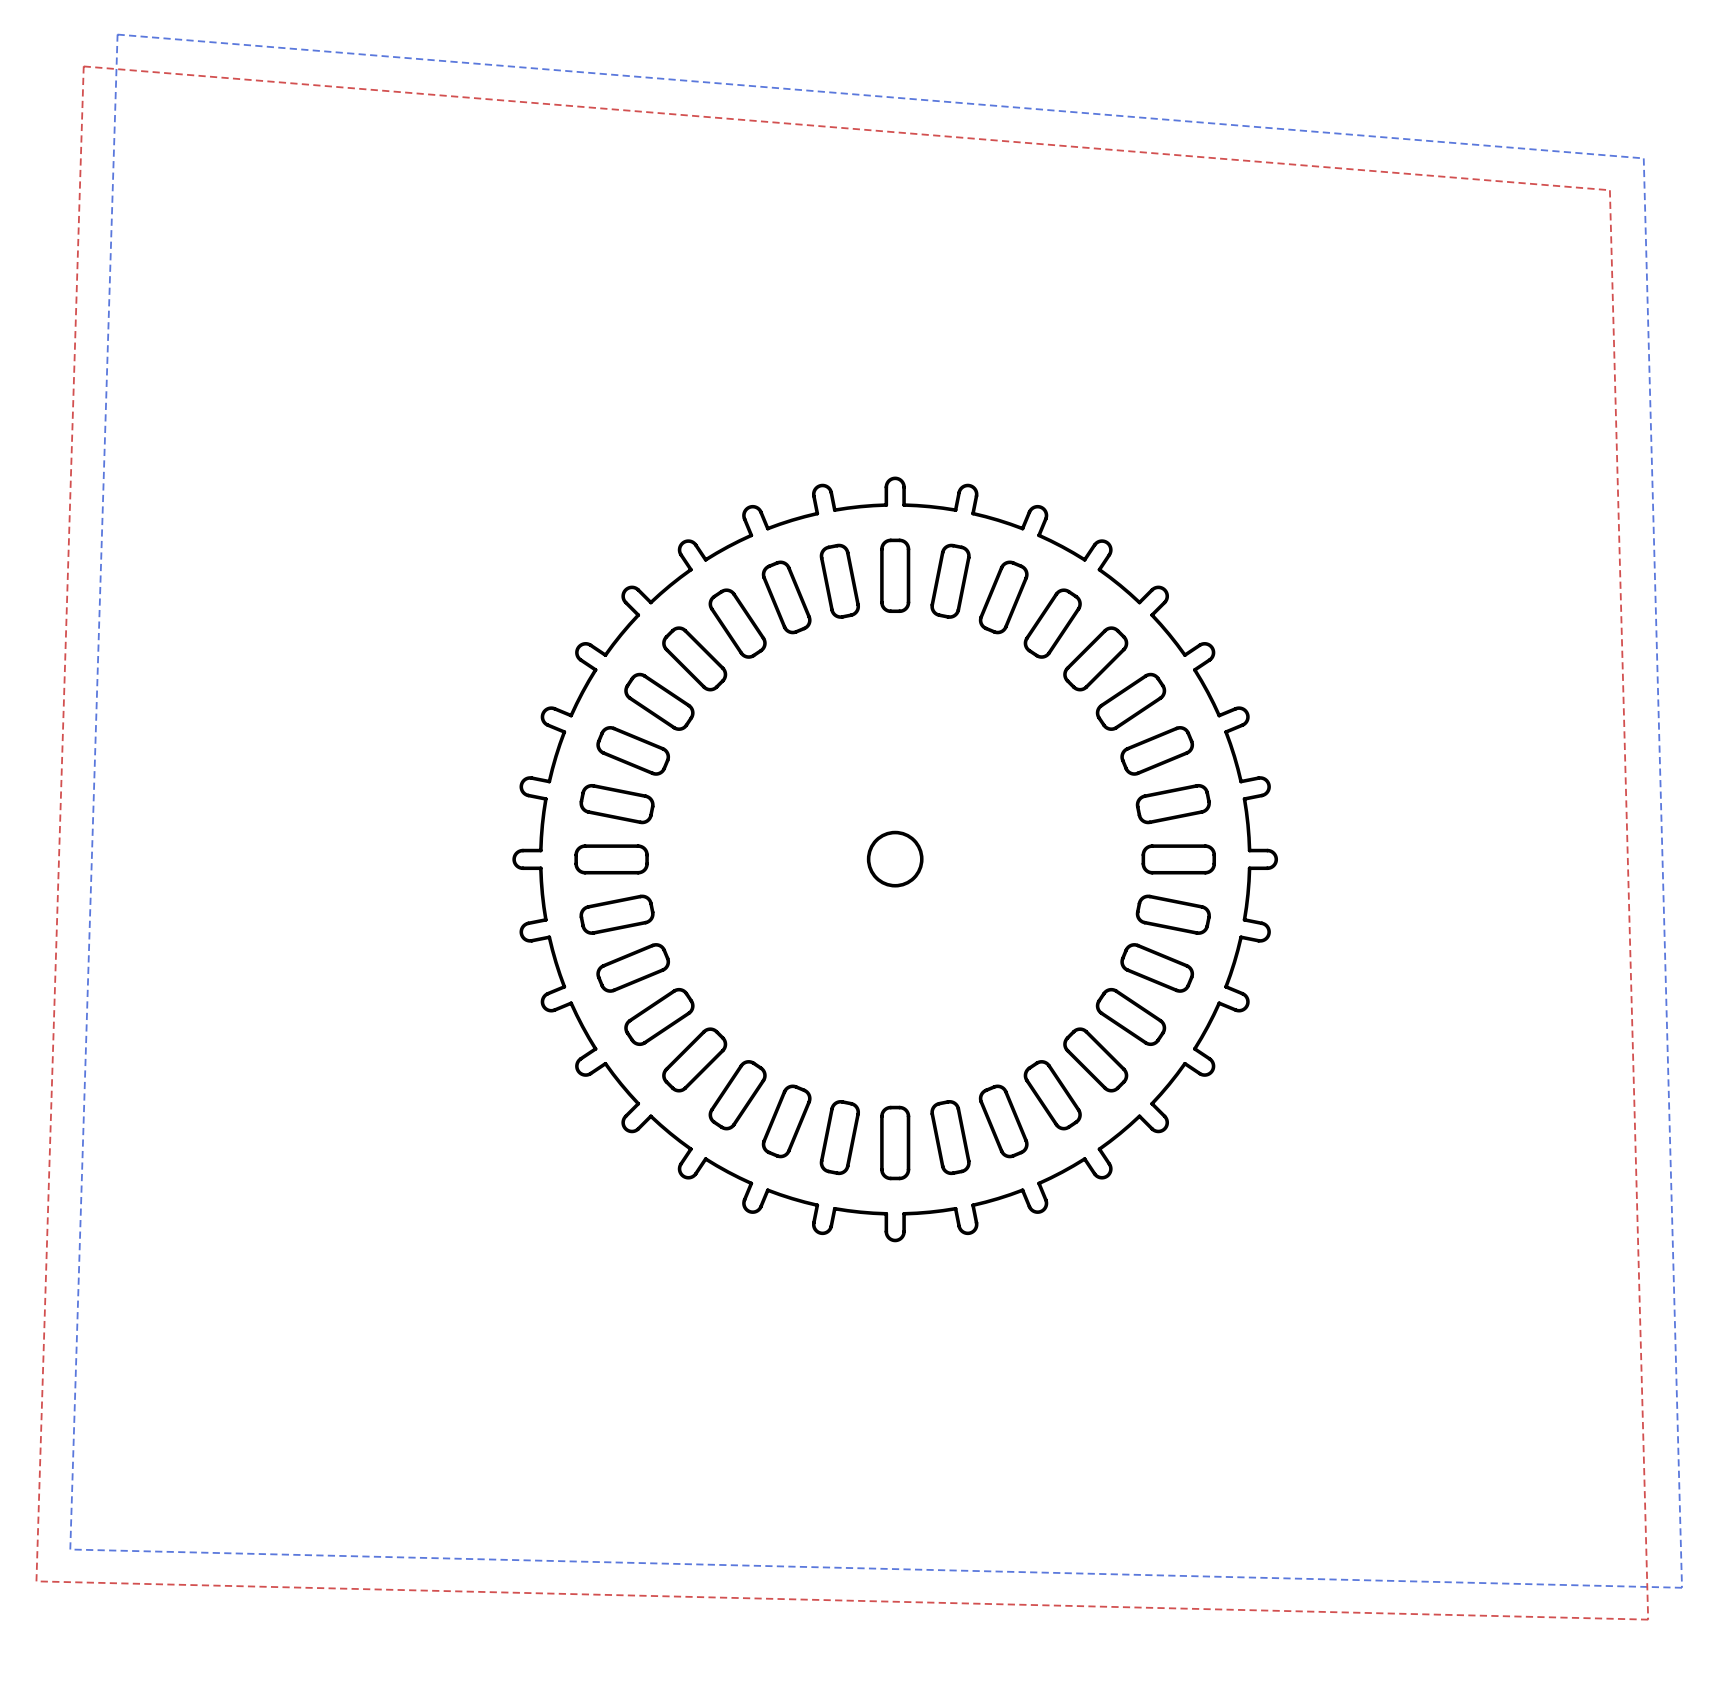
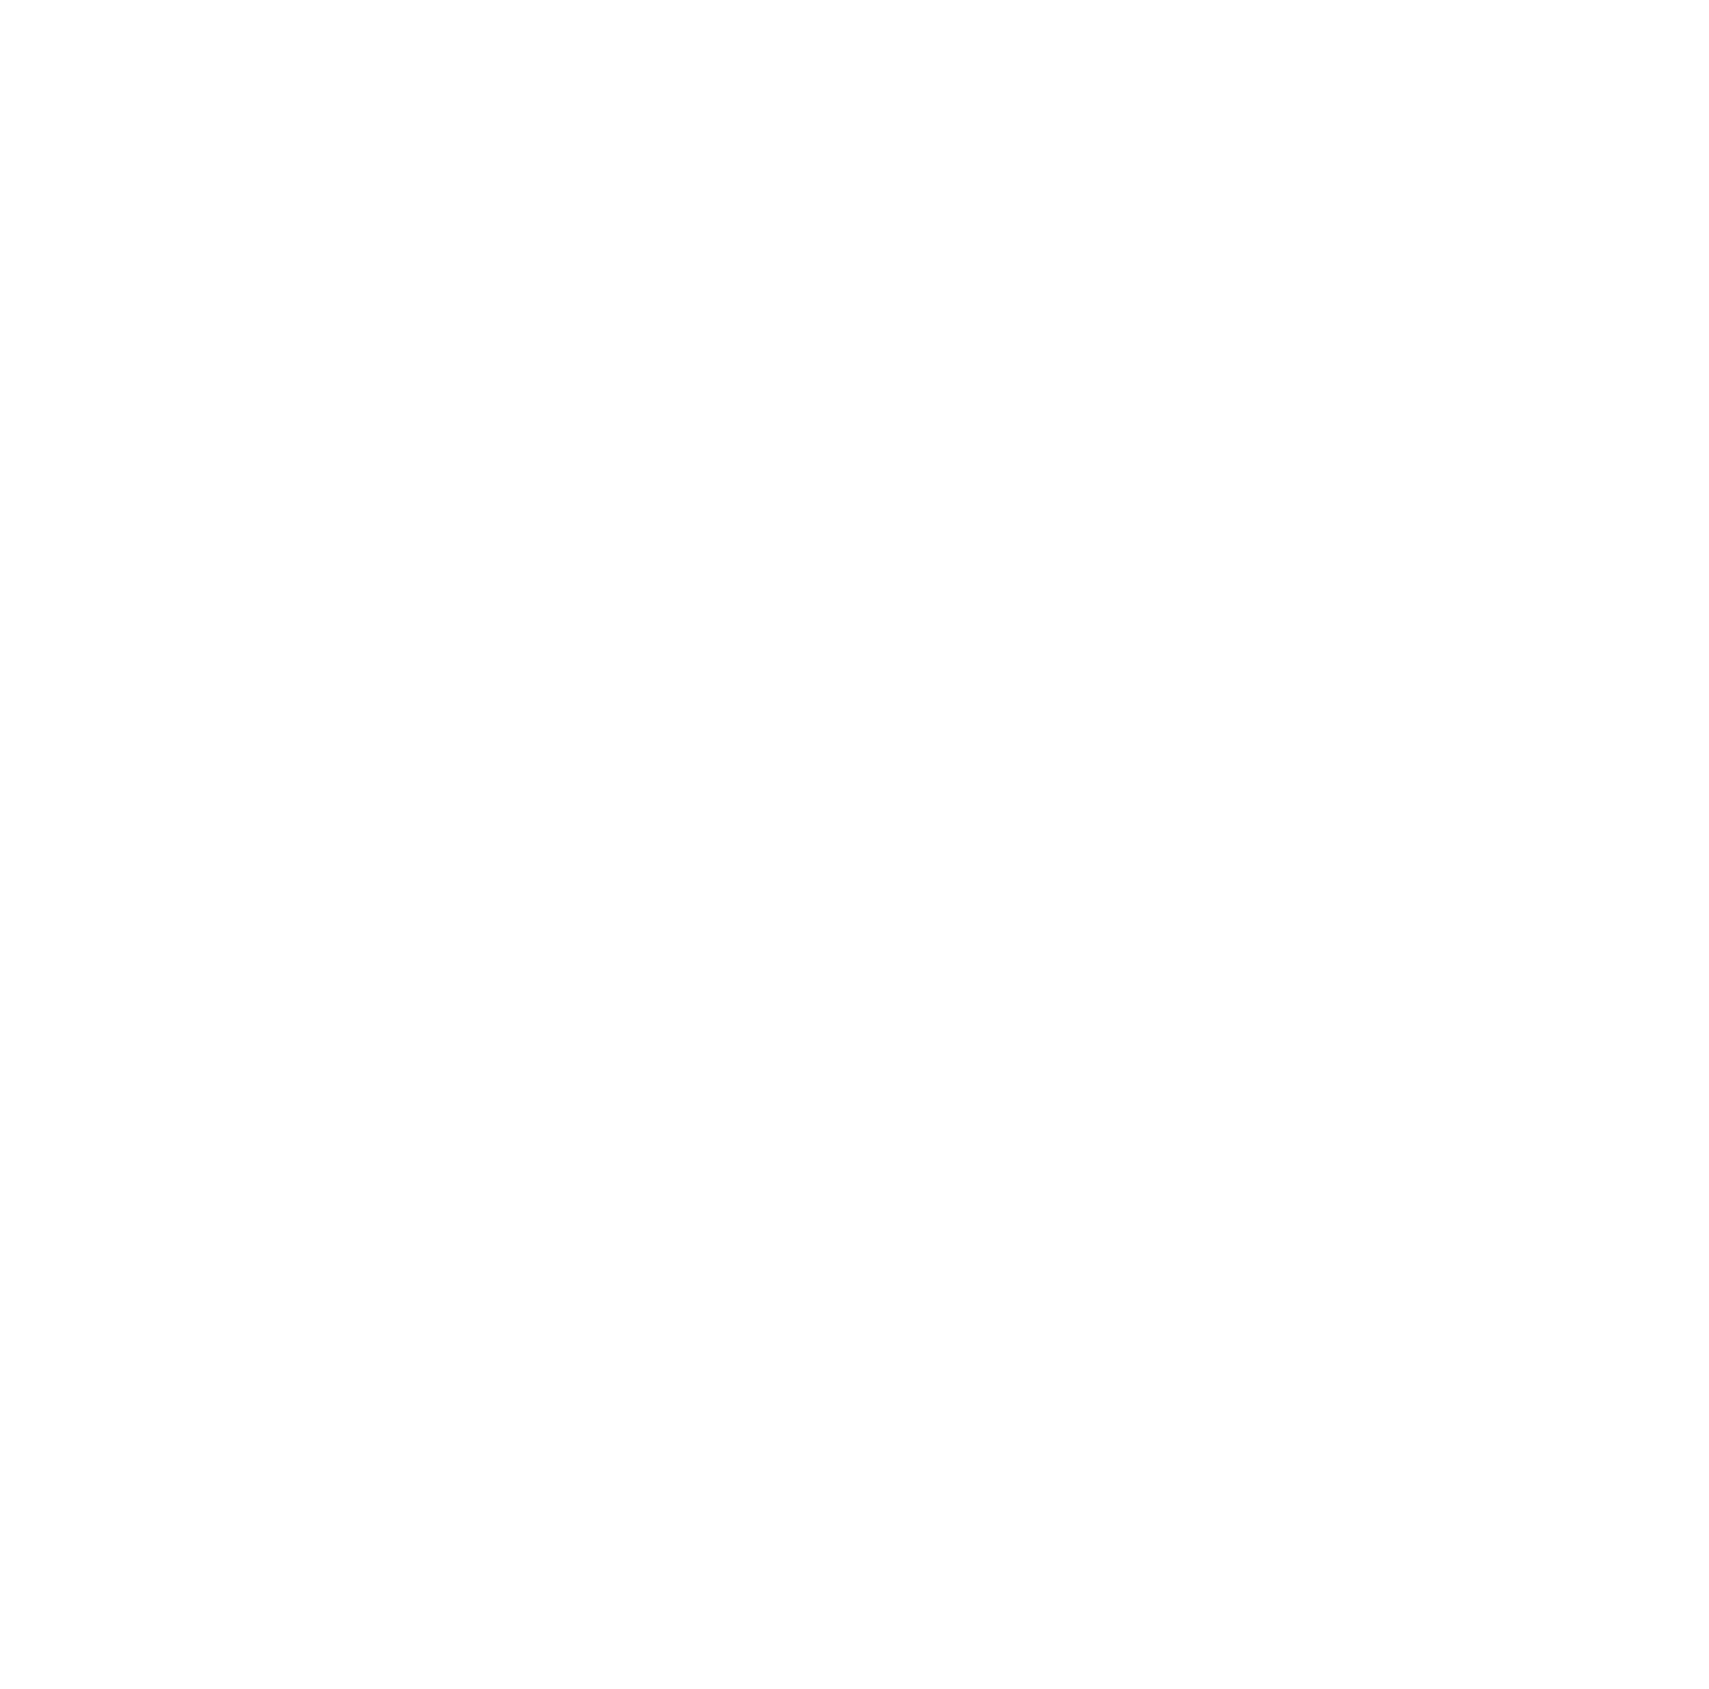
bottom zone outline: (117, 34) (70, 1549) (1682, 1587) (1643, 158) (117, 34) -> none
top zone outline: (83, 66) (36, 1581) (1648, 1619) (1609, 190) (83, 66) -> none
board edge: (886, 487) (886, 505) (834, 510) (829, 489) (825, 485) (819, 485) (813, 493) (817, 513) (767, 528) (759, 510) (755, 506) (749, 507) (745, 511) (743, 516) (751, 535) (705, 559) (694, 543) (688, 541) (683, 542) (680, 547) (680, 552) (690, 569) (650, 602) (636, 588) (630, 587) (625, 589) (623, 595) (624, 600) (638, 615) (605, 655) (588, 644) (582, 644) (578, 647) (576, 653) (579, 658) (595, 669) (571, 715) (552, 708) (546, 709) (543, 713) (542, 719) (545, 724) (564, 731) (549, 781) (529, 777) (524, 780) (521, 785) (522, 790) (526, 794) (545, 798) (540, 850) (520, 850) (515, 854) (514, 859) (515, 864) (520, 867) (540, 868) (545, 919) (526, 924) (522, 928) (521, 933) (524, 938) (529, 940) (549, 937) (564, 986) (545, 994) (542, 999) (543, 1005) (546, 1009) (552, 1010) (571, 1003) (595, 1048) (579, 1060) (576, 1065) (578, 1071) (582, 1074) (588, 1074) (605, 1063) (638, 1103) (624, 1118) (623, 1123) (625, 1128) (630, 1131) (636, 1130) (650, 1116) (690, 1149) (680, 1166) (680, 1171) (683, 1176) (688, 1177) (694, 1175) (705, 1159) (751, 1183) (743, 1202) (745, 1207) (749, 1211) (755, 1211) (759, 1208) (767, 1190) (817, 1205) (813, 1225) (815, 1230) (820, 1233) (826, 1232) (830, 1228) (834, 1208) (886, 1213) (886, 1233) (889, 1238) (895, 1240) (900, 1238) (903, 1233) (904, 1213) (955, 1208) (959, 1228) (963, 1232) (969, 1233) (974, 1230) (976, 1225) (973, 1205) (1022, 1190) (1030, 1208) (1035, 1211) (1041, 1211) (1045, 1207) (1046, 1202) (1039, 1183) (1084, 1159) (1096, 1175) (1101, 1177) (1106, 1176) (1110, 1171) (1110, 1166) (1099, 1149) (1139, 1116) (1153, 1130) (1159, 1131) (1164, 1128) (1167, 1123) (1166, 1118) (1152, 1103) (1184, 1063) (1201, 1074) (1207, 1074) (1212, 1071) (1213, 1065) (1211, 1060) (1194, 1048) (1219, 1003) (1237, 1010) (1243, 1009) (1247, 1005) (1247, 999) (1244, 994) (1226, 986) (1241, 937) (1260, 940) (1266, 938) (1268, 933) (1268, 928) (1264, 924) (1244, 919) (1249, 868) (1269, 867) (1274, 864) (1276, 859) (1274, 854) (1269, 850) (1249, 850) (1244, 798) (1264, 794) (1268, 790) (1268, 785) (1266, 780) (1260, 777) (1241, 781) (1226, 731) (1244, 724) (1247, 719) (1247, 713) (1243, 709) (1237, 708) (1219, 715) (1194, 669) (1211, 658) (1213, 653) (1212, 647) (1207, 644) (1201, 644) (1184, 655) (1152, 615) (1166, 600) (1167, 595) (1164, 589) (1159, 587) (1153, 588) (1139, 602) (1099, 569) (1110, 552) (1110, 547) (1106, 542) (1101, 541) (1096, 543) (1084, 559) (1039, 535) (1046, 516) (1045, 511) (1041, 507) (1035, 506) (1030, 510) (1022, 528) (973, 513) (976, 493) (970, 485) (964, 485) (960, 489) (955, 510) (904, 505) (903, 484) (897, 478) (889, 480) (886, 487) -> none
board edge: (890, 540) (903, 541) (908, 548) (908, 603) (905, 608) (900, 611) (887, 610) (881, 603) (881, 548) (885, 542) (890, 540) -> none
board edge: (837, 545) (825, 548) (821, 556) (832, 611) (835, 615) (841, 617) (854, 613) (858, 605) (847, 551) (843, 546) (840, 545) (837, 545) -> none
board edge: (953, 545) (964, 548) (968, 556) (958, 611) (954, 615) (949, 617) (936, 613) (932, 605) (942, 551) (947, 546) (953, 545) -> none
board edge: (777, 562) (766, 568) (763, 576) (785, 628) (789, 631) (795, 632) (807, 626) (809, 617) (788, 566) (782, 562) (777, 562) -> none
board edge: (1013, 562) (1024, 568) (1026, 576) (1005, 628) (1001, 631) (995, 632) (983, 626) (980, 617) (1002, 566) (1007, 562) (1013, 562) -> none
board edge: (721, 591) (711, 599) (711, 607) (742, 654) (747, 656) (752, 656) (763, 648) (764, 639) (733, 593) (728, 590) (721, 591) -> none
board edge: (1068, 591) (1078, 599) (1079, 607) (1048, 654) (1043, 656) (1037, 656) (1026, 648) (1026, 639) (1057, 593) (1063, 590) (1068, 591) -> none
board edge: (672, 630) (664, 639) (665, 648) (704, 687) (710, 689) (715, 687) (724, 677) (723, 669) (684, 629) (679, 628) (672, 630) -> none
board edge: (1105, 630) (1066, 670) (1066, 678) (1075, 688) (1085, 687) (1125, 647) (1125, 639) (1116, 629) (1110, 628) (1105, 630) -> none
board edge: (644, 676) (690, 707) (692, 715) (684, 726) (675, 728) (628, 696) (626, 689) (633, 677) (639, 674) (644, 676) -> none
board edge: (1145, 676) (1099, 707) (1098, 715) (1105, 726) (1115, 728) (1162, 696) (1164, 689) (1157, 677) (1151, 674) (1145, 676) -> none
board edge: (613, 728) (664, 749) (668, 758) (663, 770) (653, 773) (601, 751) (598, 744) (602, 732) (606, 728) (613, 728) -> none
board edge: (1176, 728) (1125, 749) (1122, 758) (1127, 770) (1136, 773) (1188, 751) (1192, 744) (1187, 732) (1182, 728) (1176, 728) -> none
board edge: (593, 785) (647, 796) (652, 804) (650, 817) (641, 822) (586, 811) (581, 804) (583, 791) (587, 786) (593, 785) -> none
board edge: (1196, 785) (1142, 796) (1137, 804) (1140, 817) (1148, 822) (1204, 811) (1208, 804) (1206, 791) (1202, 786) (1199, 785) (1196, 785) -> none
round board edge: [866, 830, 924, 888] -> none
board edge: (585, 846) (640, 846) (646, 852) (646, 866) (639, 872) (582, 872) (576, 867) (576, 853) (579, 847) (585, 846) -> none
board edge: (1152, 846) (1207, 846) (1213, 852) (1213, 866) (1206, 872) (1149, 872) (1144, 867) (1143, 853) (1146, 847) (1152, 846) -> none
board edge: (640, 896) (586, 907) (581, 915) (583, 928) (592, 933) (647, 921) (652, 915) (650, 902) (647, 897) (640, 896) -> none
board edge: (1149, 896) (1204, 907) (1209, 915) (1206, 928) (1197, 933) (1142, 921) (1137, 915) (1139, 902) (1144, 897) (1149, 896) -> none
board edge: (652, 945) (601, 967) (598, 975) (603, 987) (612, 990) (664, 968) (668, 961) (663, 949) (658, 945) (652, 945) -> none
board edge: (1137, 945) (1188, 967) (1192, 975) (1187, 987) (1177, 990) (1125, 968) (1122, 961) (1126, 949) (1130, 945) (1137, 945) -> none
board edge: (674, 991) (628, 1022) (626, 1030) (633, 1042) (643, 1043) (690, 1011) (692, 1004) (685, 992) (680, 989) (674, 991) -> none
board edge: (1116, 991) (1162, 1022) (1163, 1030) (1156, 1042) (1146, 1043) (1099, 1011) (1097, 1004) (1104, 992) (1110, 989) (1116, 991) -> none
board edge: (704, 1031) (665, 1071) (665, 1080) (674, 1089) (684, 1088) (724, 1048) (724, 1040) (715, 1030) (709, 1029) (704, 1031) -> none
board edge: (1073, 1031) (1065, 1040) (1066, 1049) (1106, 1088) (1111, 1090) (1116, 1088) (1125, 1079) (1124, 1070) (1085, 1030) (1078, 1029) (1073, 1031) -> none
board edge: (753, 1063) (763, 1070) (764, 1079) (733, 1125) (728, 1128) (722, 1127) (711, 1119) (711, 1110) (742, 1064) (748, 1061) (753, 1063) -> none
board edge: (1036, 1063) (1026, 1070) (1026, 1079) (1057, 1125) (1062, 1128) (1067, 1127) (1078, 1119) (1079, 1110) (1048, 1064) (1043, 1061) (1036, 1063) -> none
board edge: (796, 1086) (807, 1092) (809, 1100) (788, 1152) (783, 1155) (778, 1156) (766, 1150) (763, 1142) (785, 1090) (790, 1086) (796, 1086) -> none
board edge: (994, 1086) (983, 1092) (980, 1100) (1002, 1152) (1006, 1155) (1012, 1156) (1024, 1150) (1026, 1142) (1005, 1090) (1001, 1086) (994, 1086) -> none
board edge: (842, 1101) (854, 1104) (858, 1112) (847, 1167) (843, 1171) (838, 1173) (825, 1170) (821, 1162) (832, 1107) (836, 1102) (842, 1101) -> none
board edge: (947, 1101) (936, 1104) (932, 1112) (942, 1167) (946, 1171) (951, 1173) (964, 1170) (968, 1162) (958, 1107) (953, 1102) (947, 1101) -> none
board edge: (890, 1107) (903, 1108) (908, 1115) (908, 1170) (905, 1175) (900, 1178) (887, 1177) (881, 1170) (881, 1115) (885, 1109) (890, 1107) -> none

